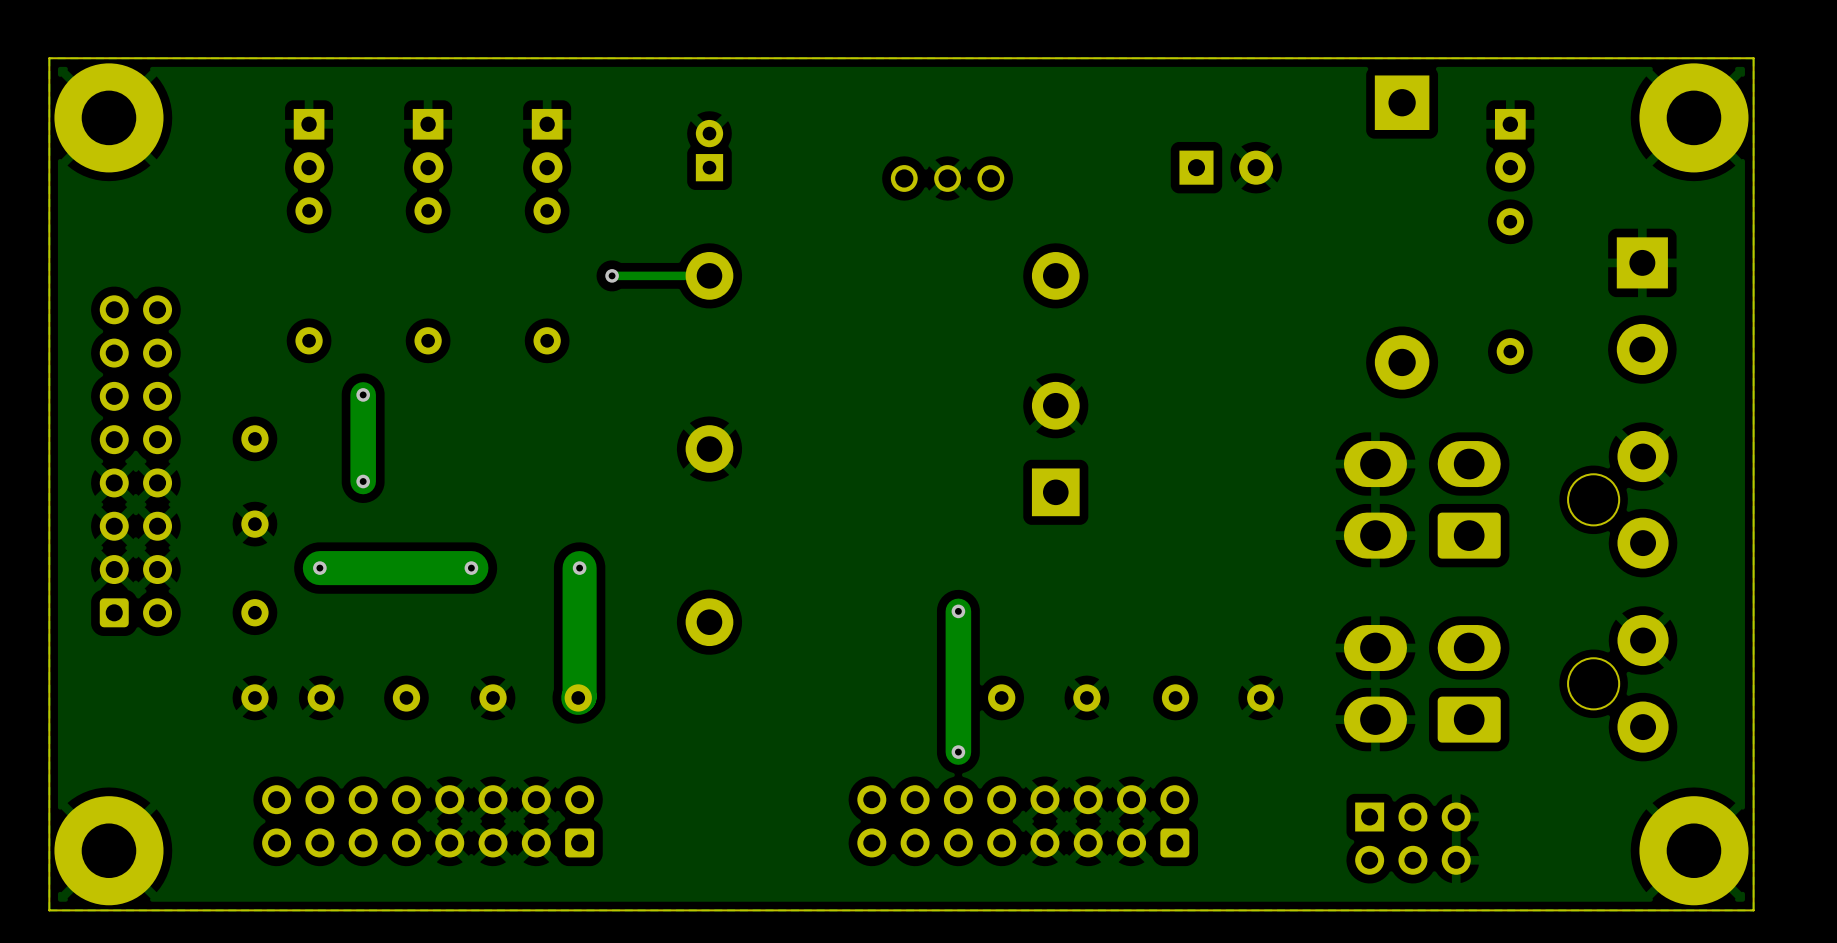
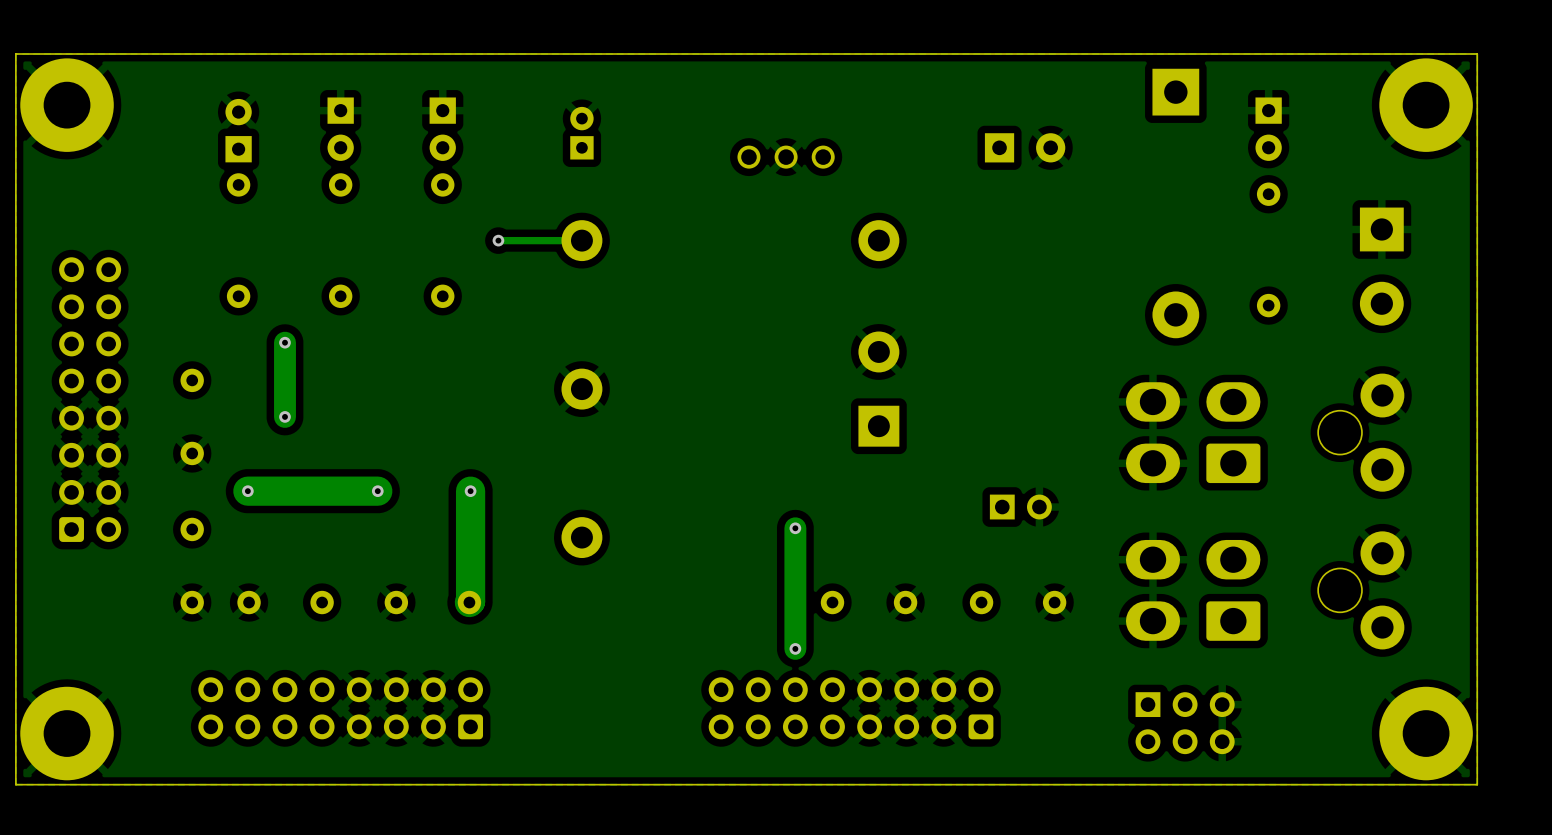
part rotation: 0° (309, 145) -> 180° (238, 130)
part: none -> (1020, 507)

